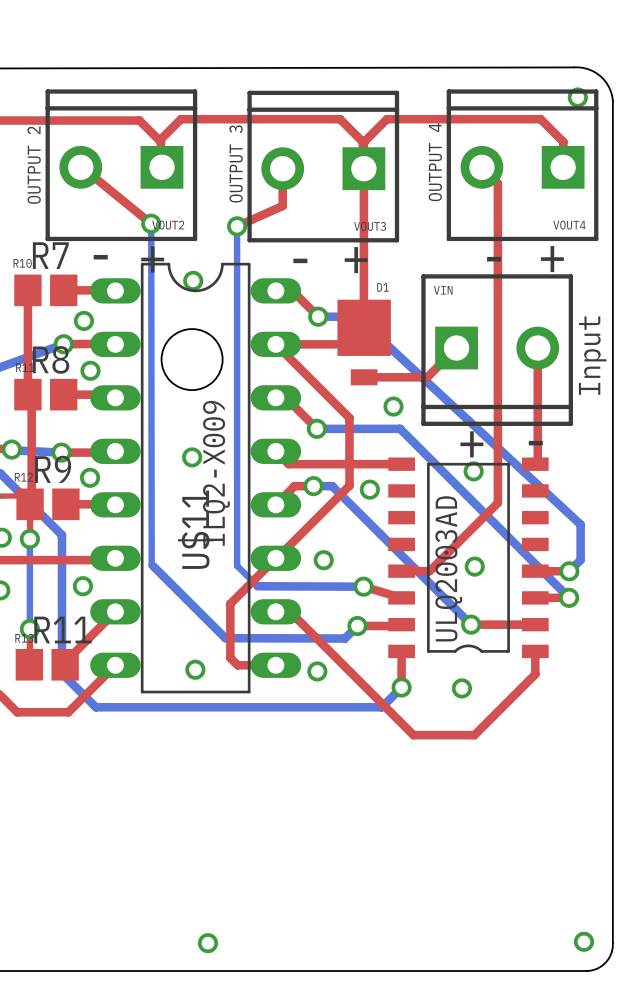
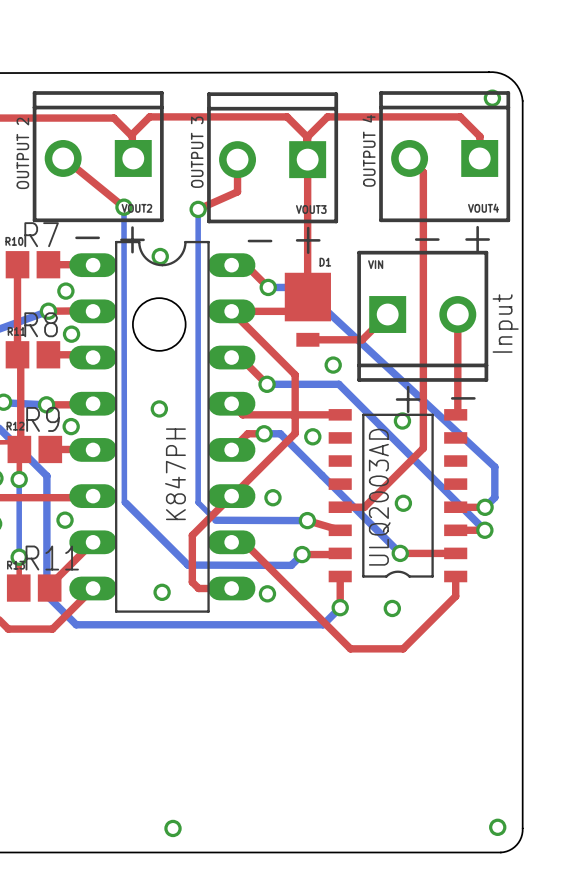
text: ILQ2-X009 (216, 473) -> none
U$11: (195, 478) -> none
part: none -> (162, 426)
text: none -> K847PH (175, 474)

